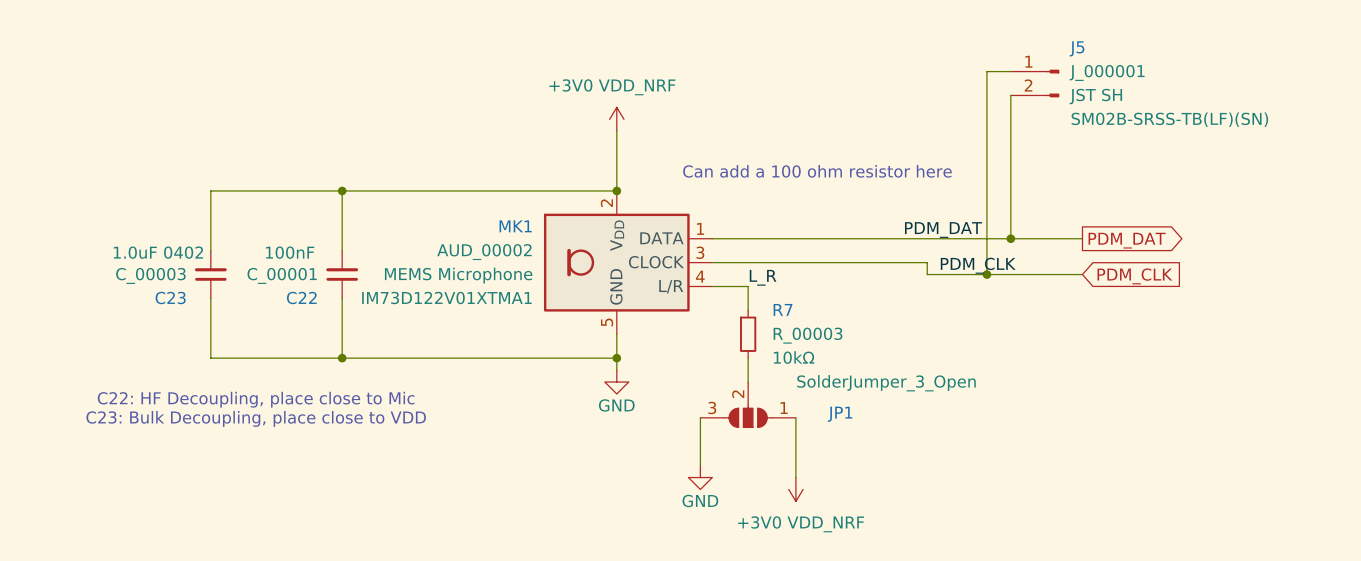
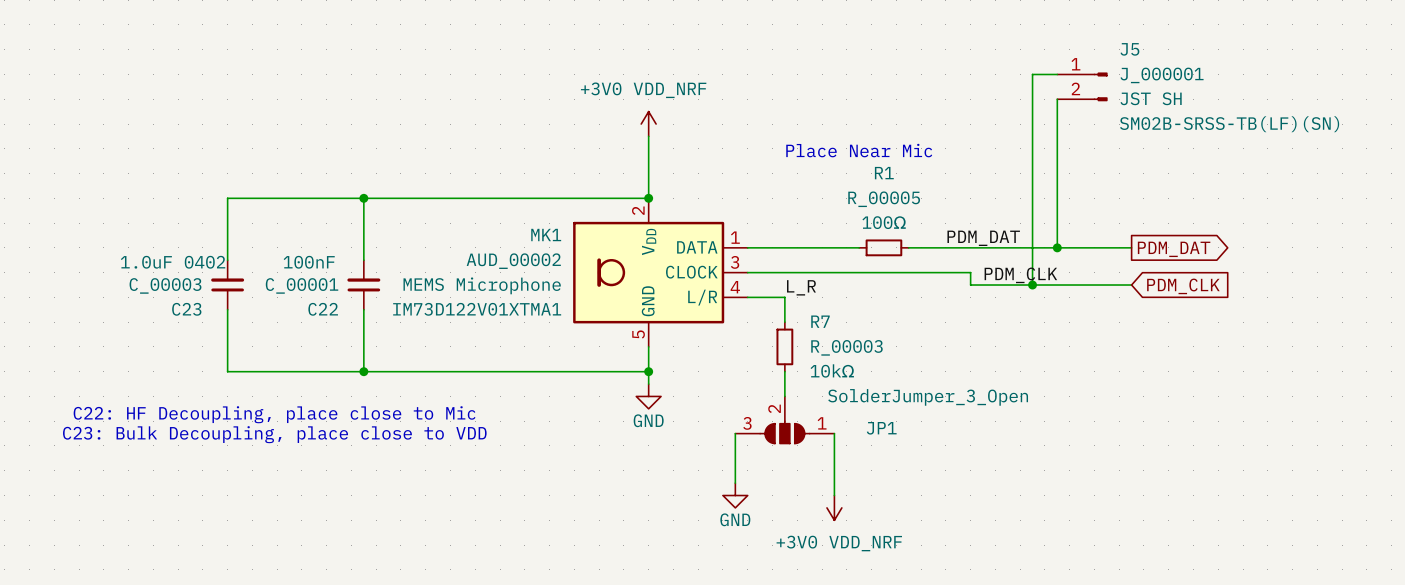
text: none -> Place Near Mic (859, 150)
text: Can add a 100 ohm resistor here (817, 171) -> none
wire: (819, 238) (867, 238) -> none
R1: none -> R_00005 (883, 247)

